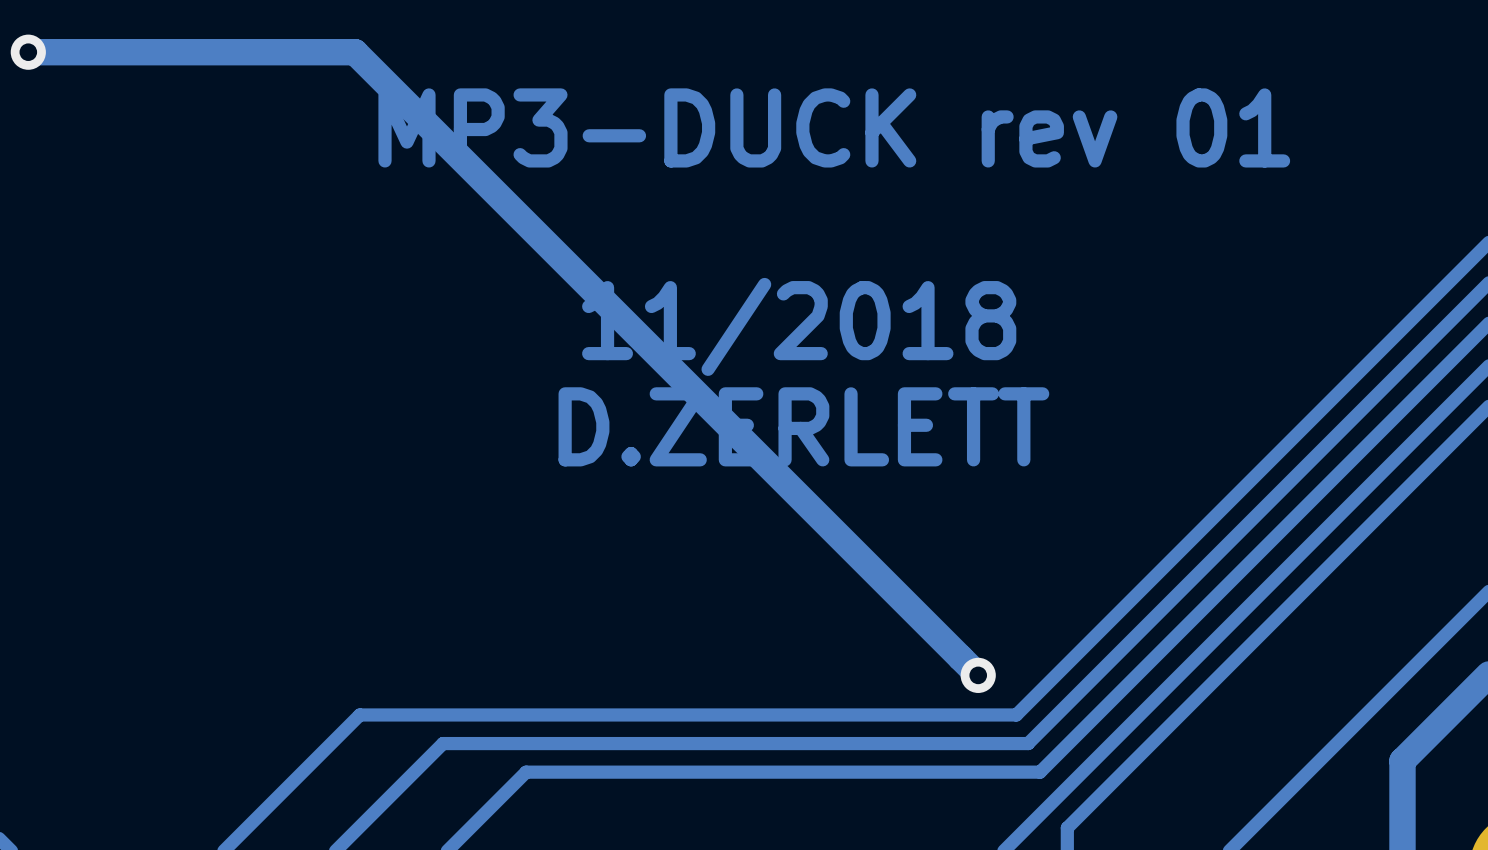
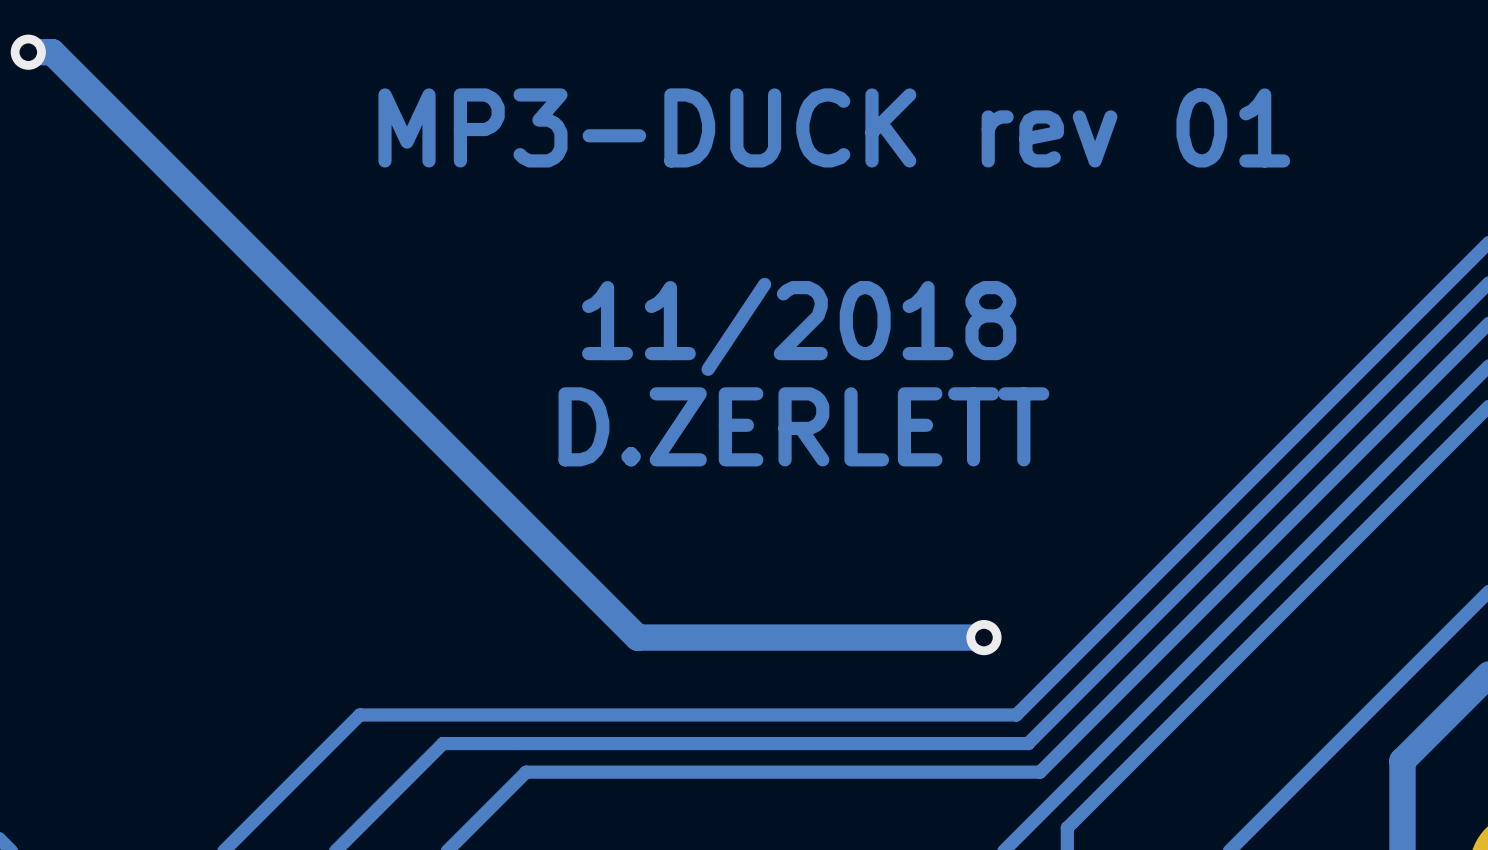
track: (52, 52) (355, 52) (978, 675) -> (52, 52) (637, 637) (983, 637)
via position: (978, 675) -> (983, 637)

